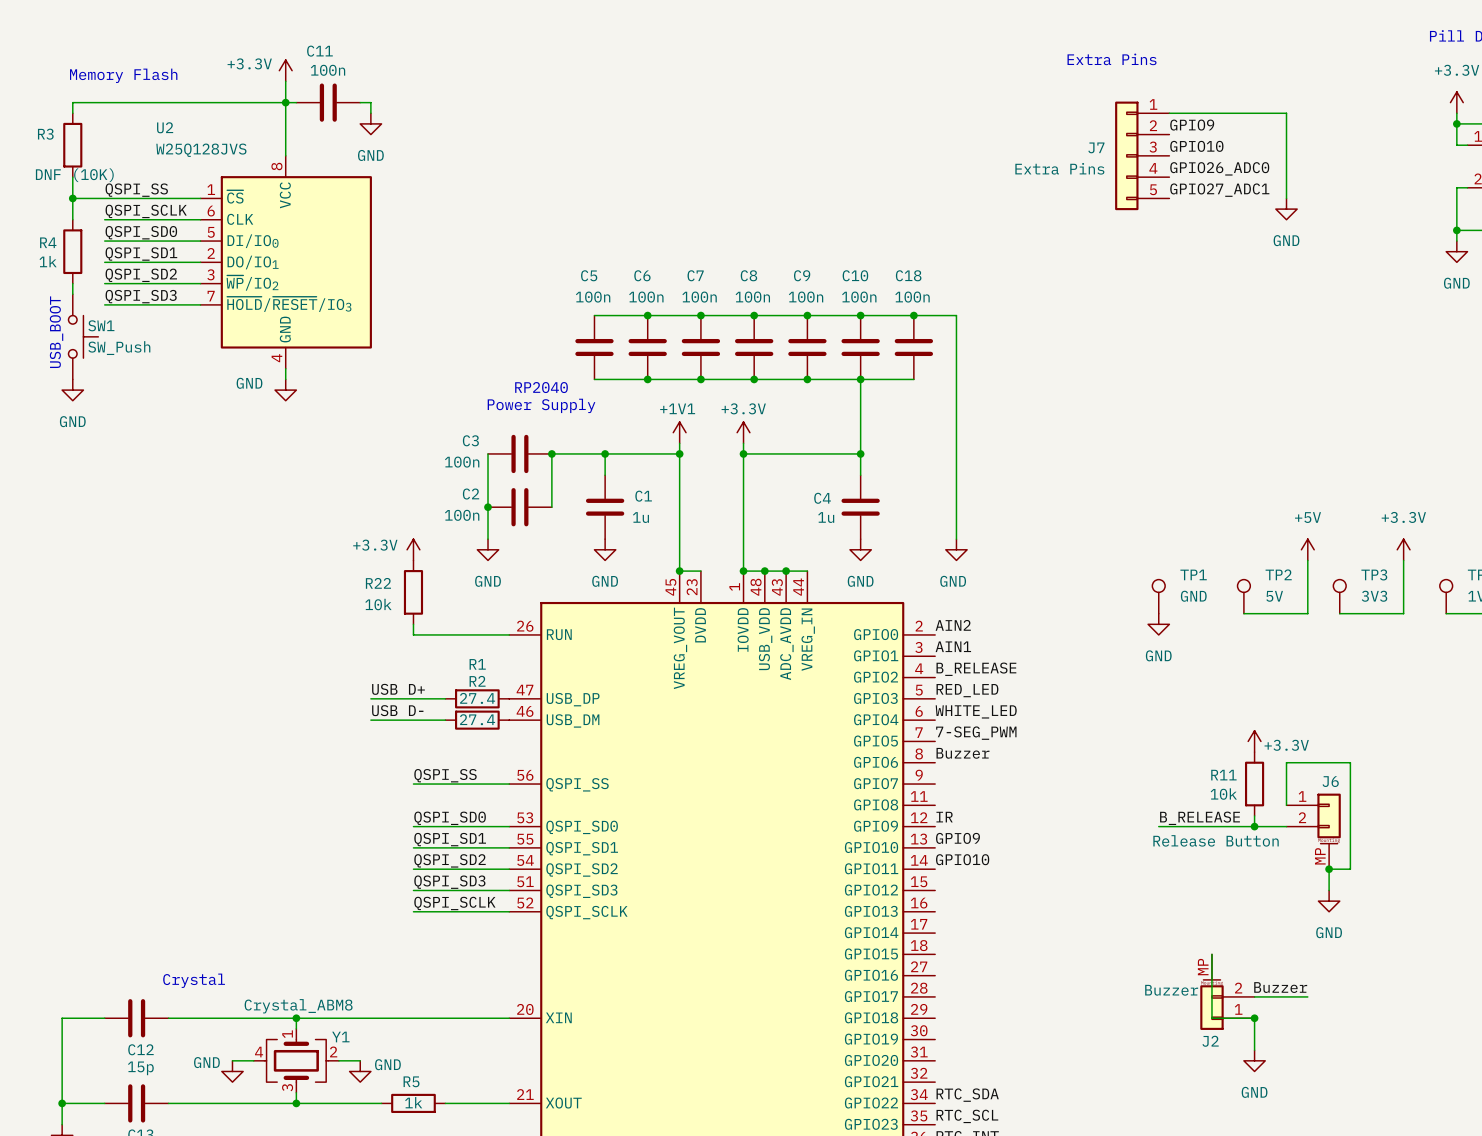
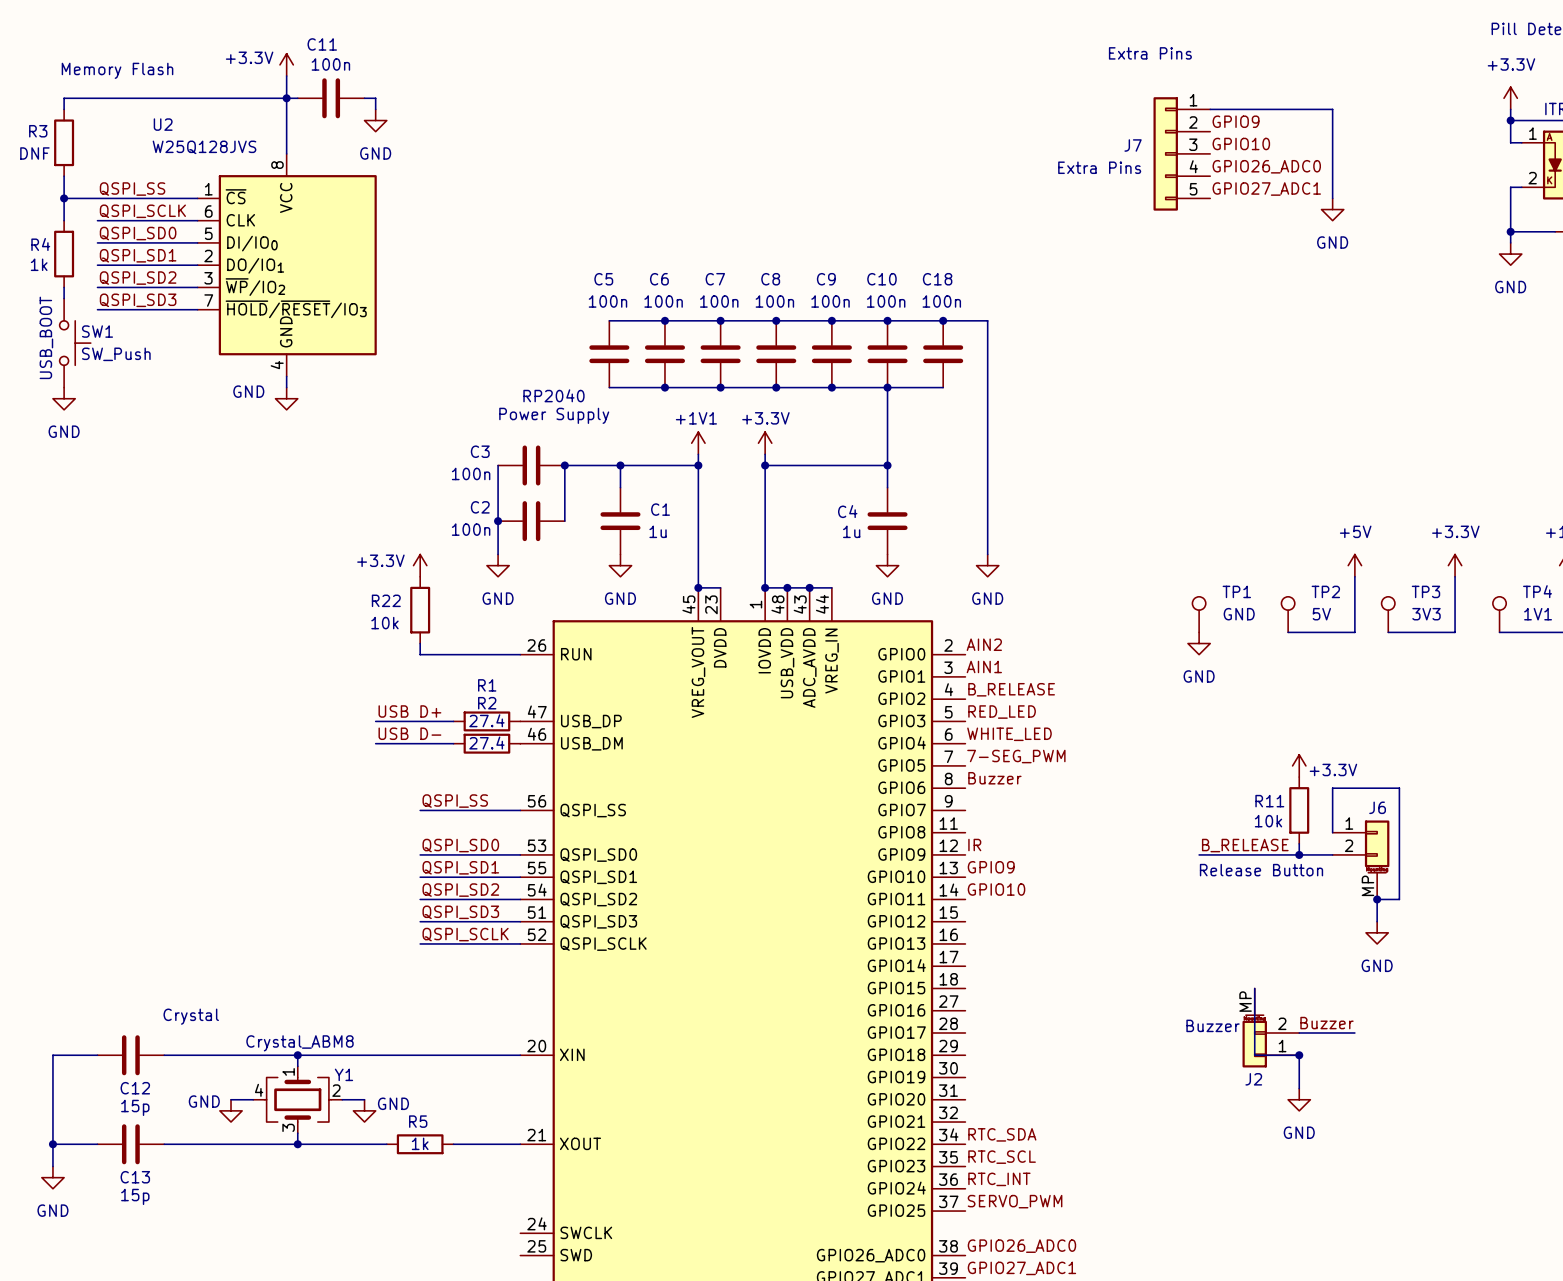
R3 value: DNF (10K) (74, 175) -> DNF (34, 153)

